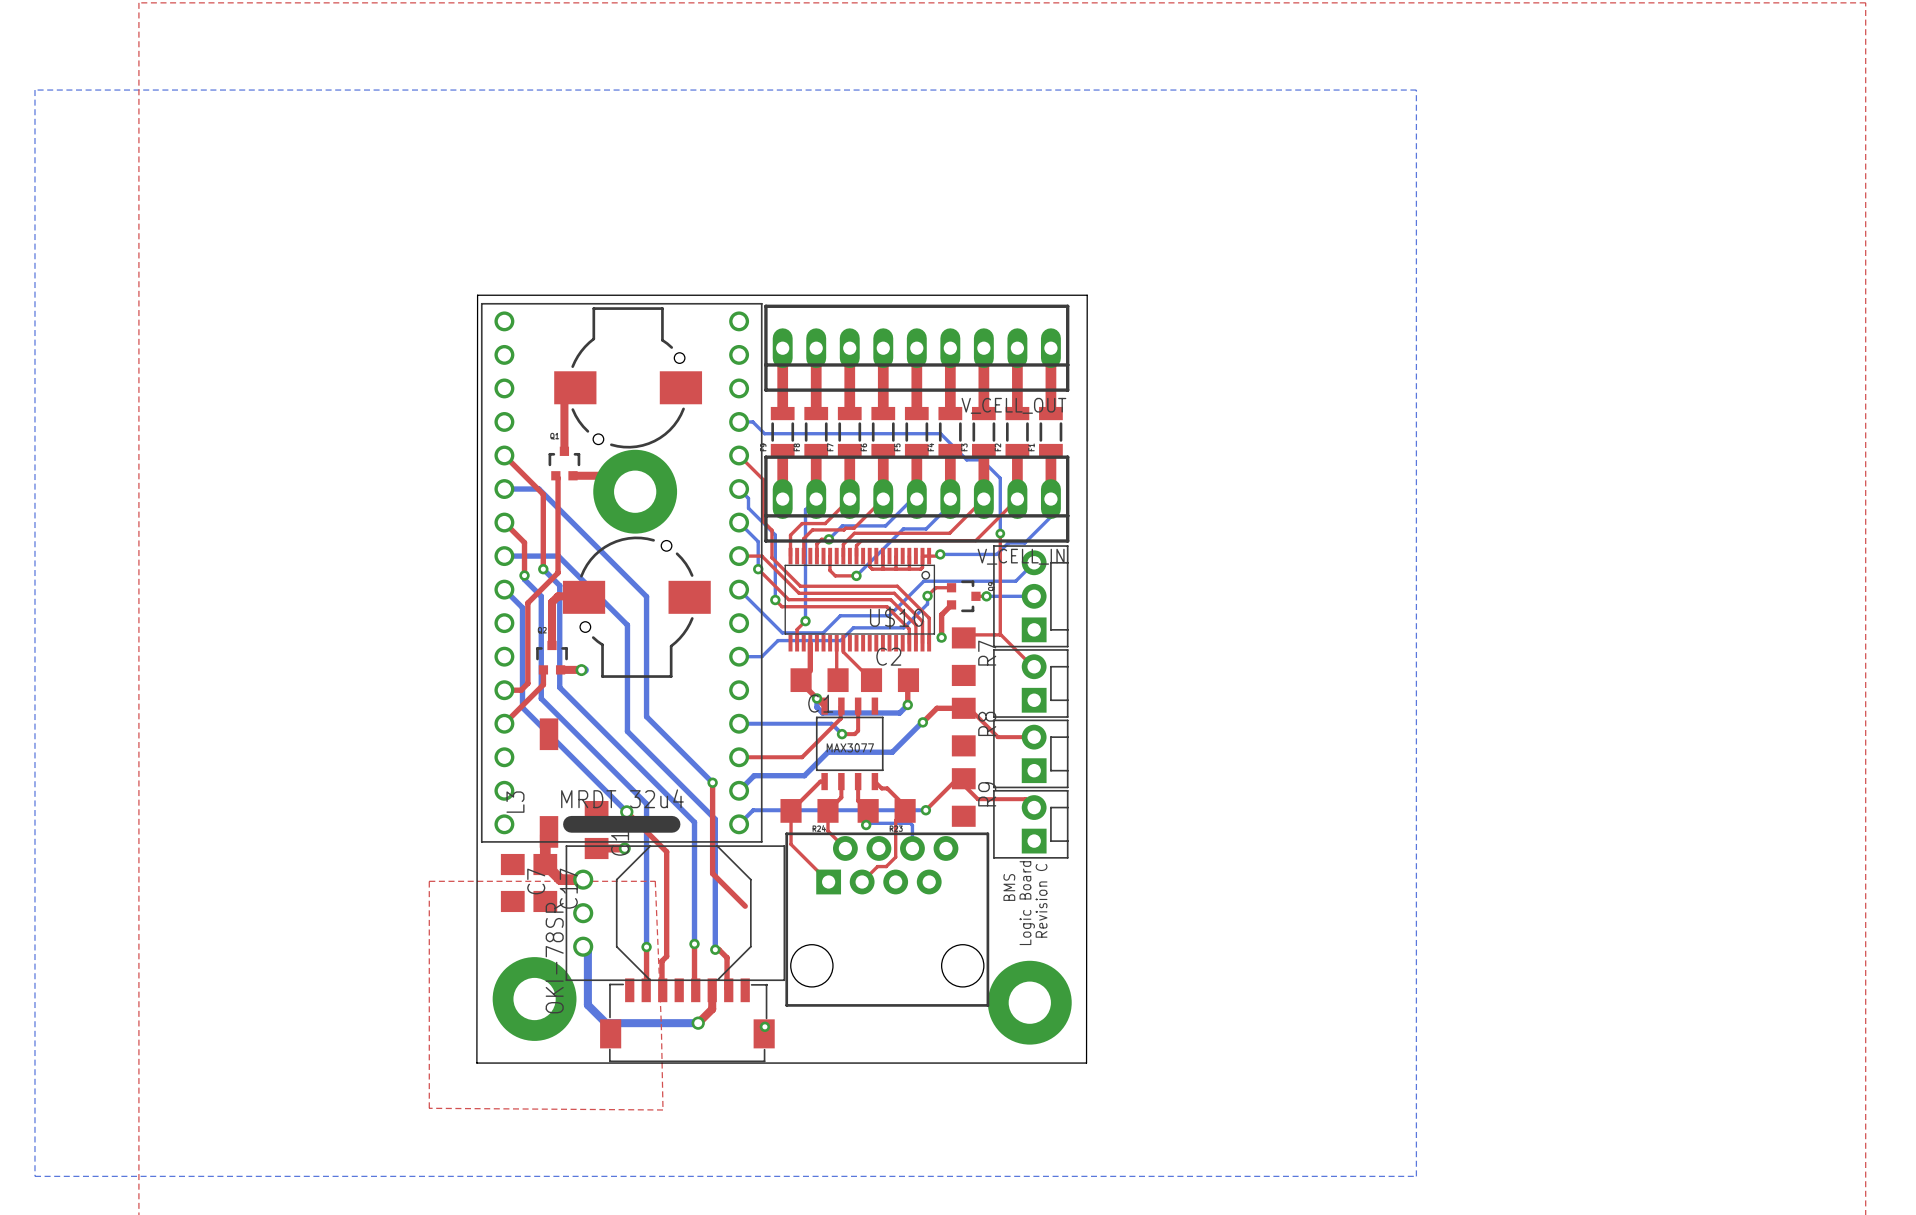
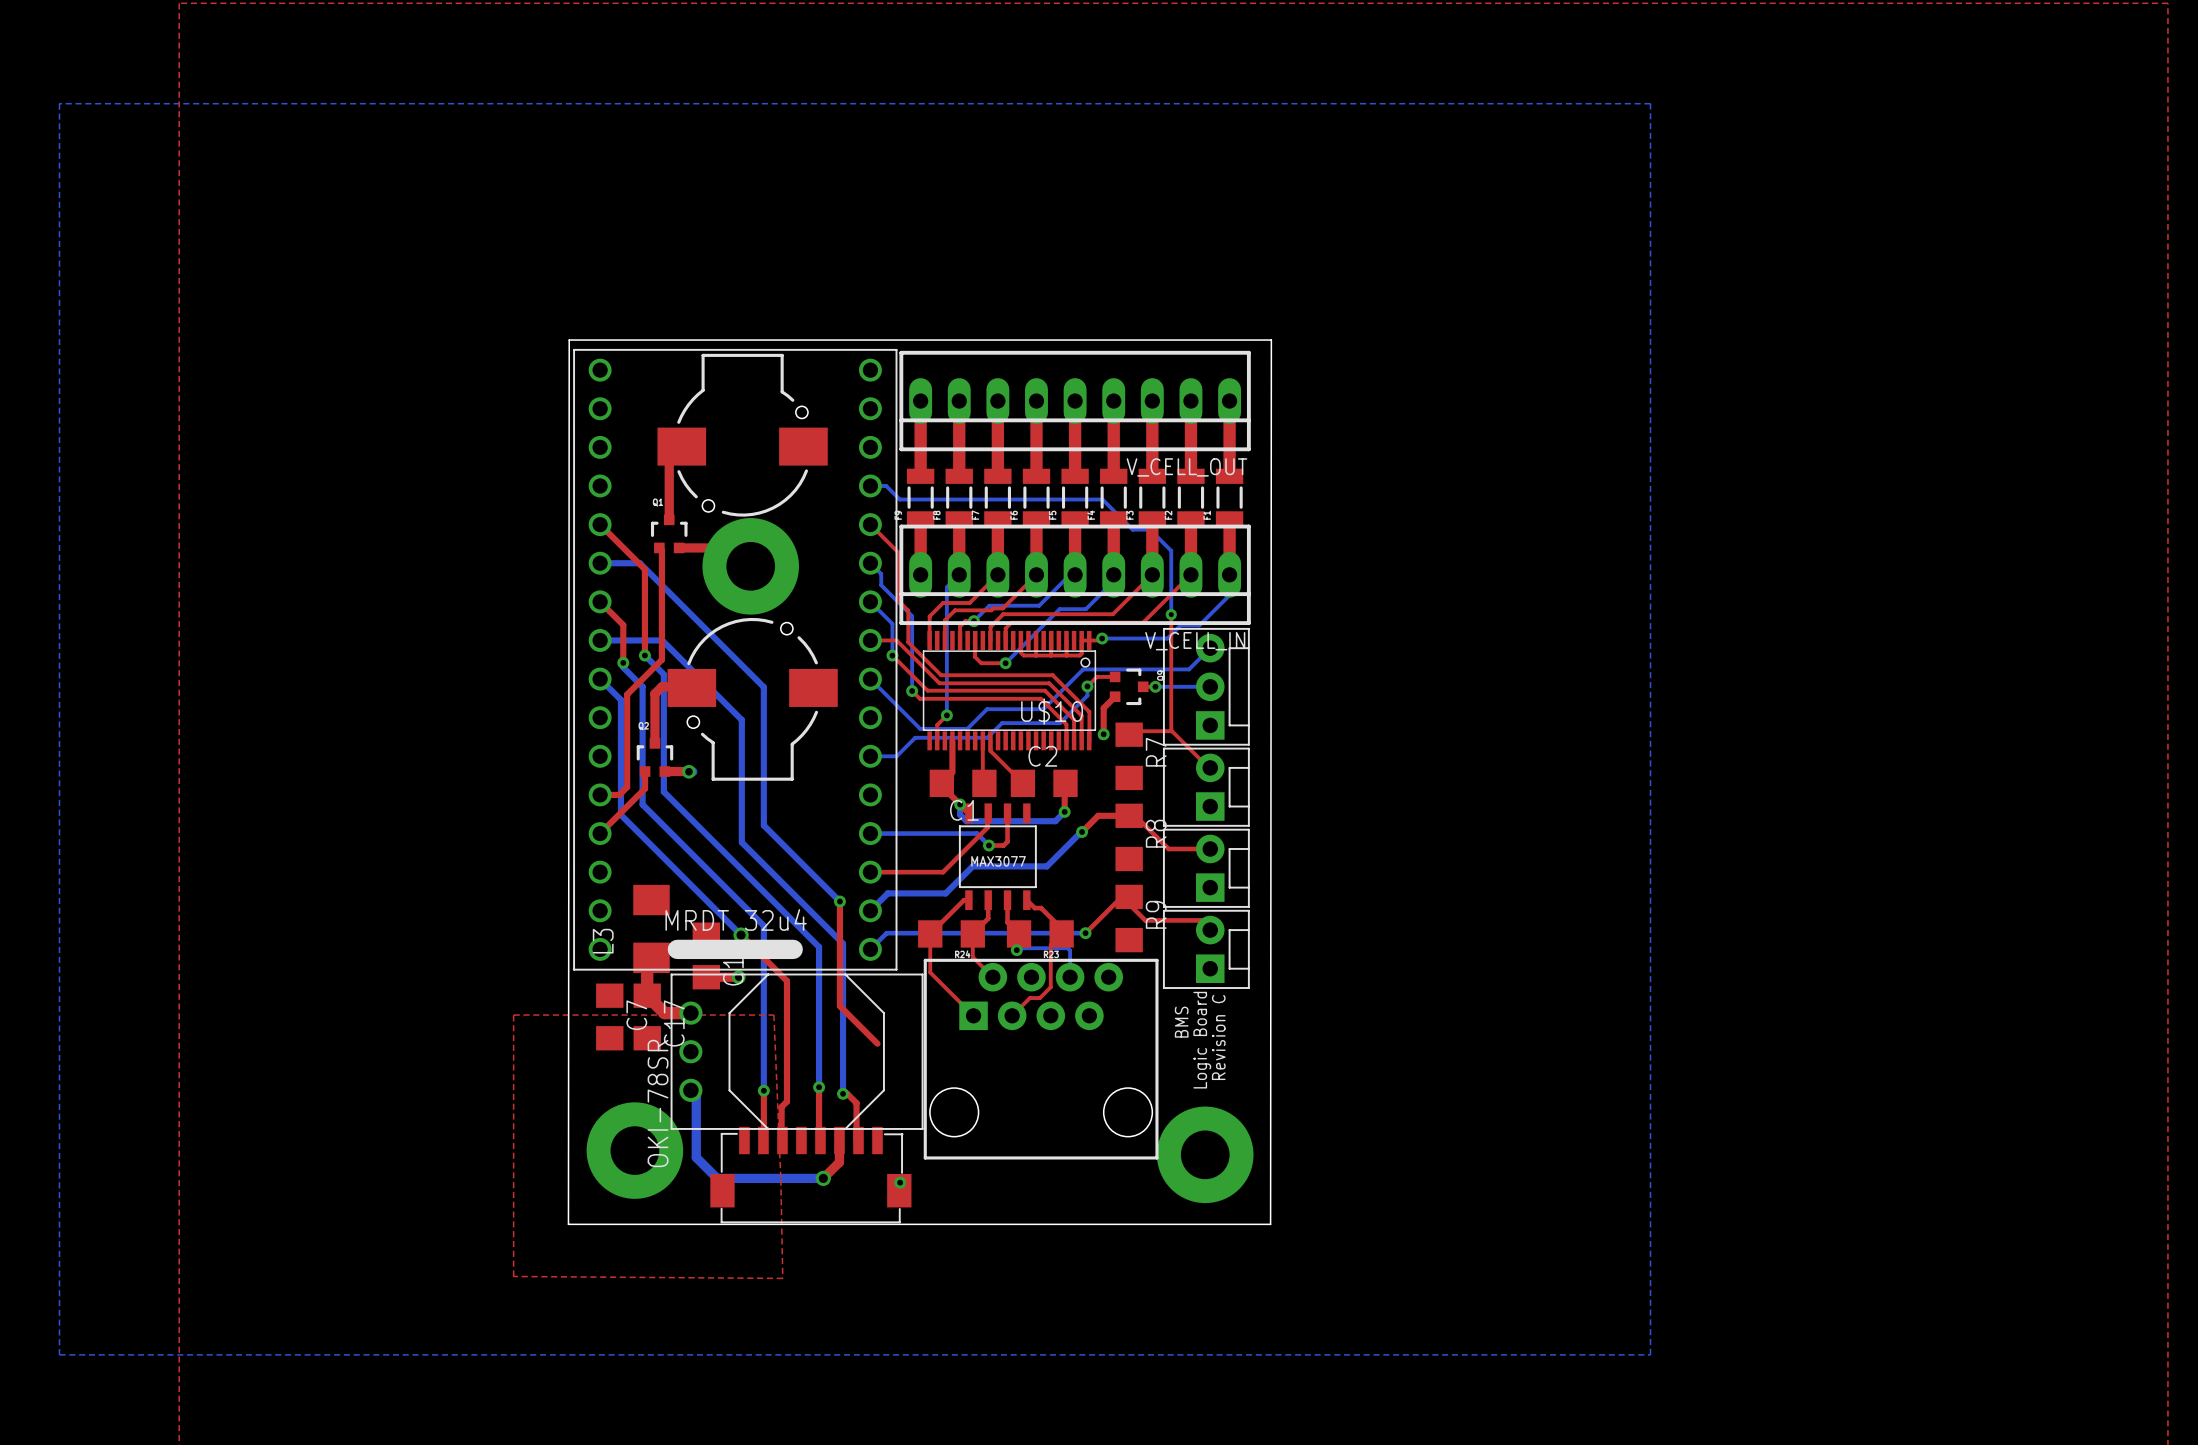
L3 footprint: [539, 718, 559, 848] -> [633, 884, 670, 974]

